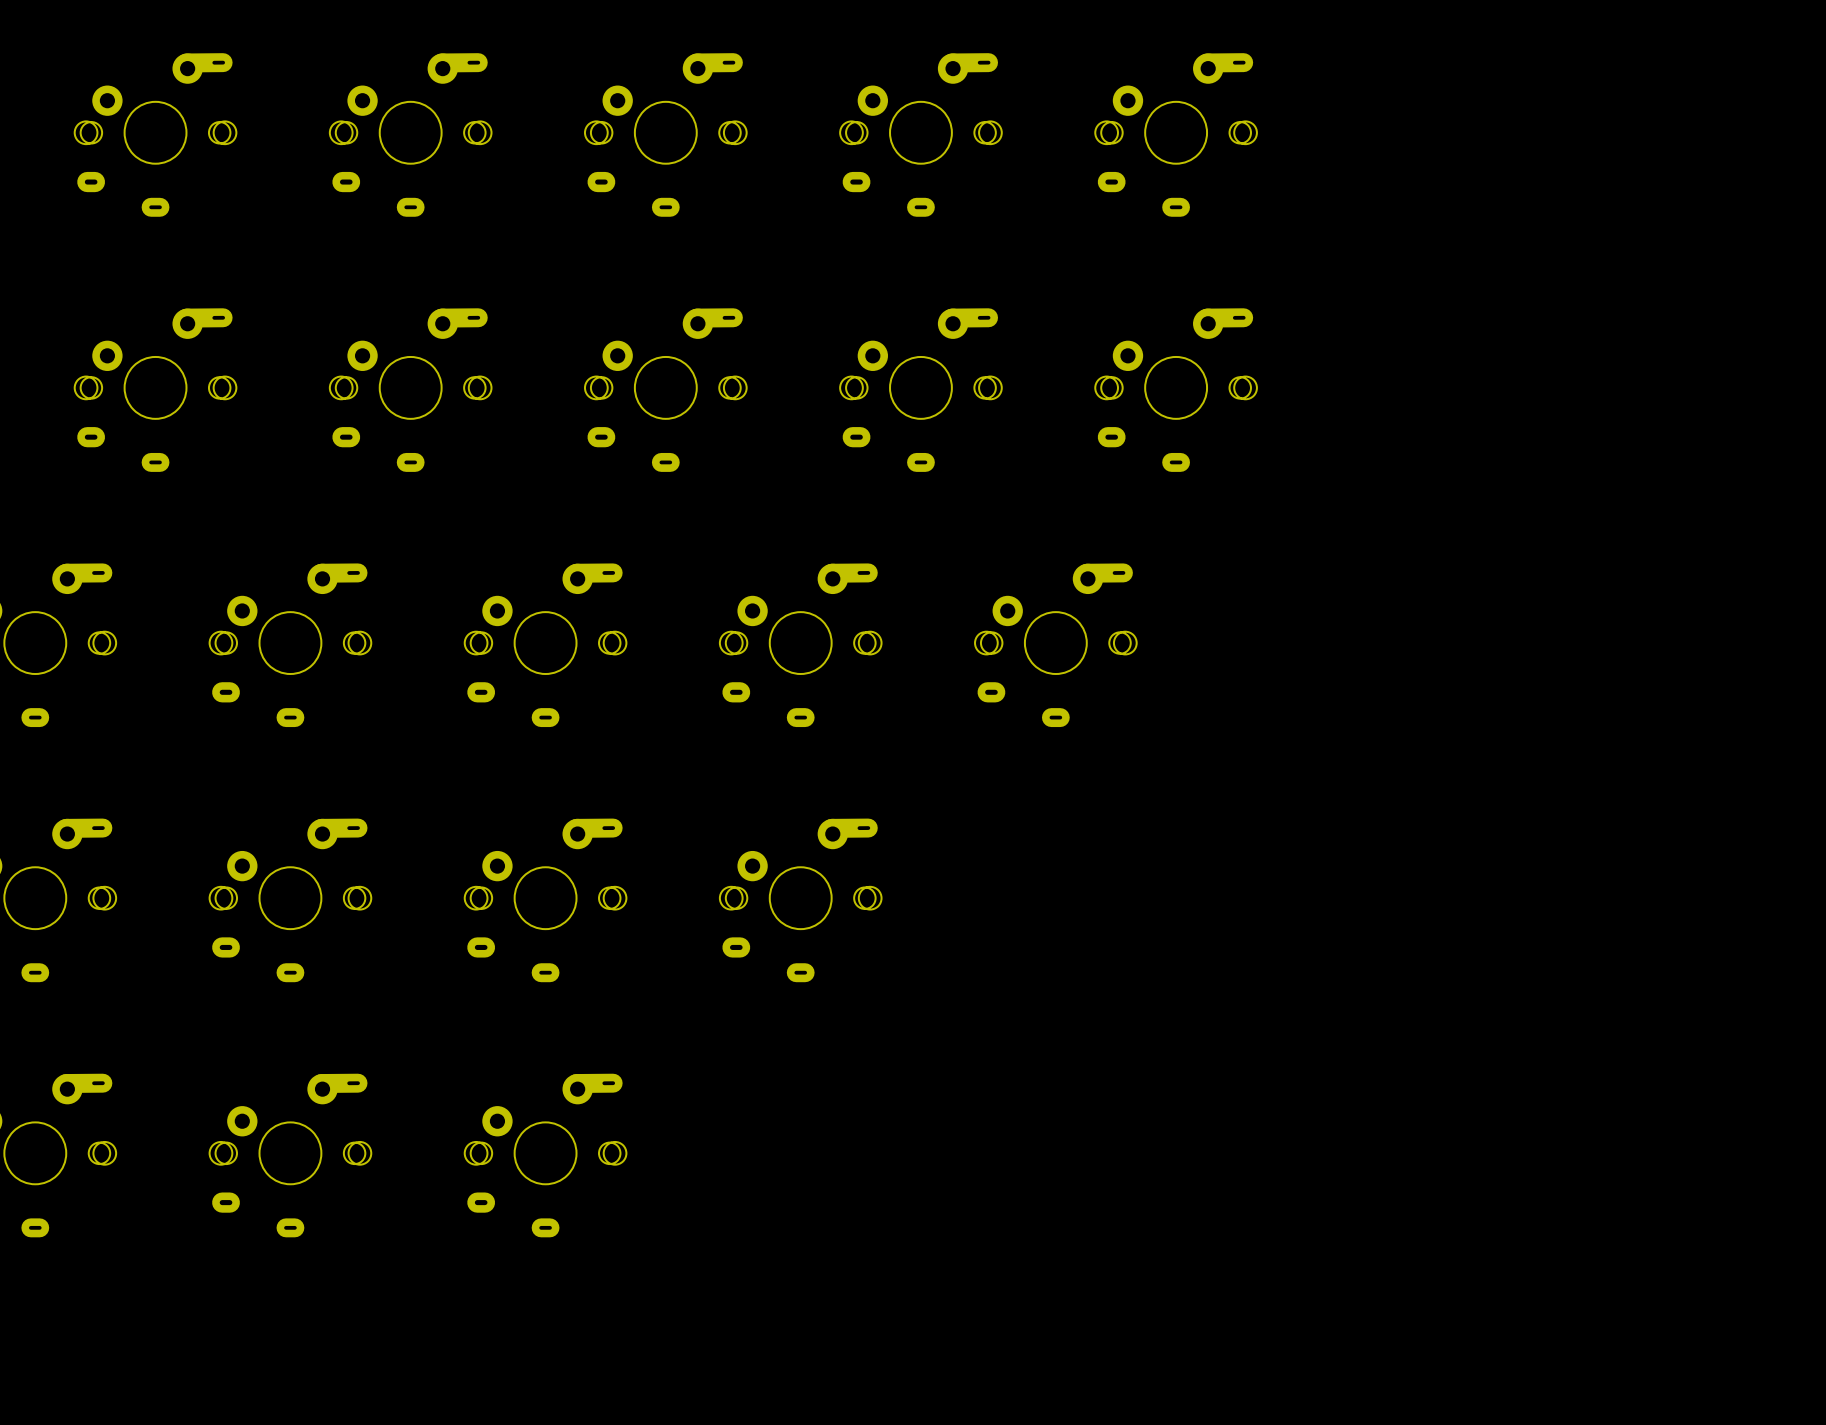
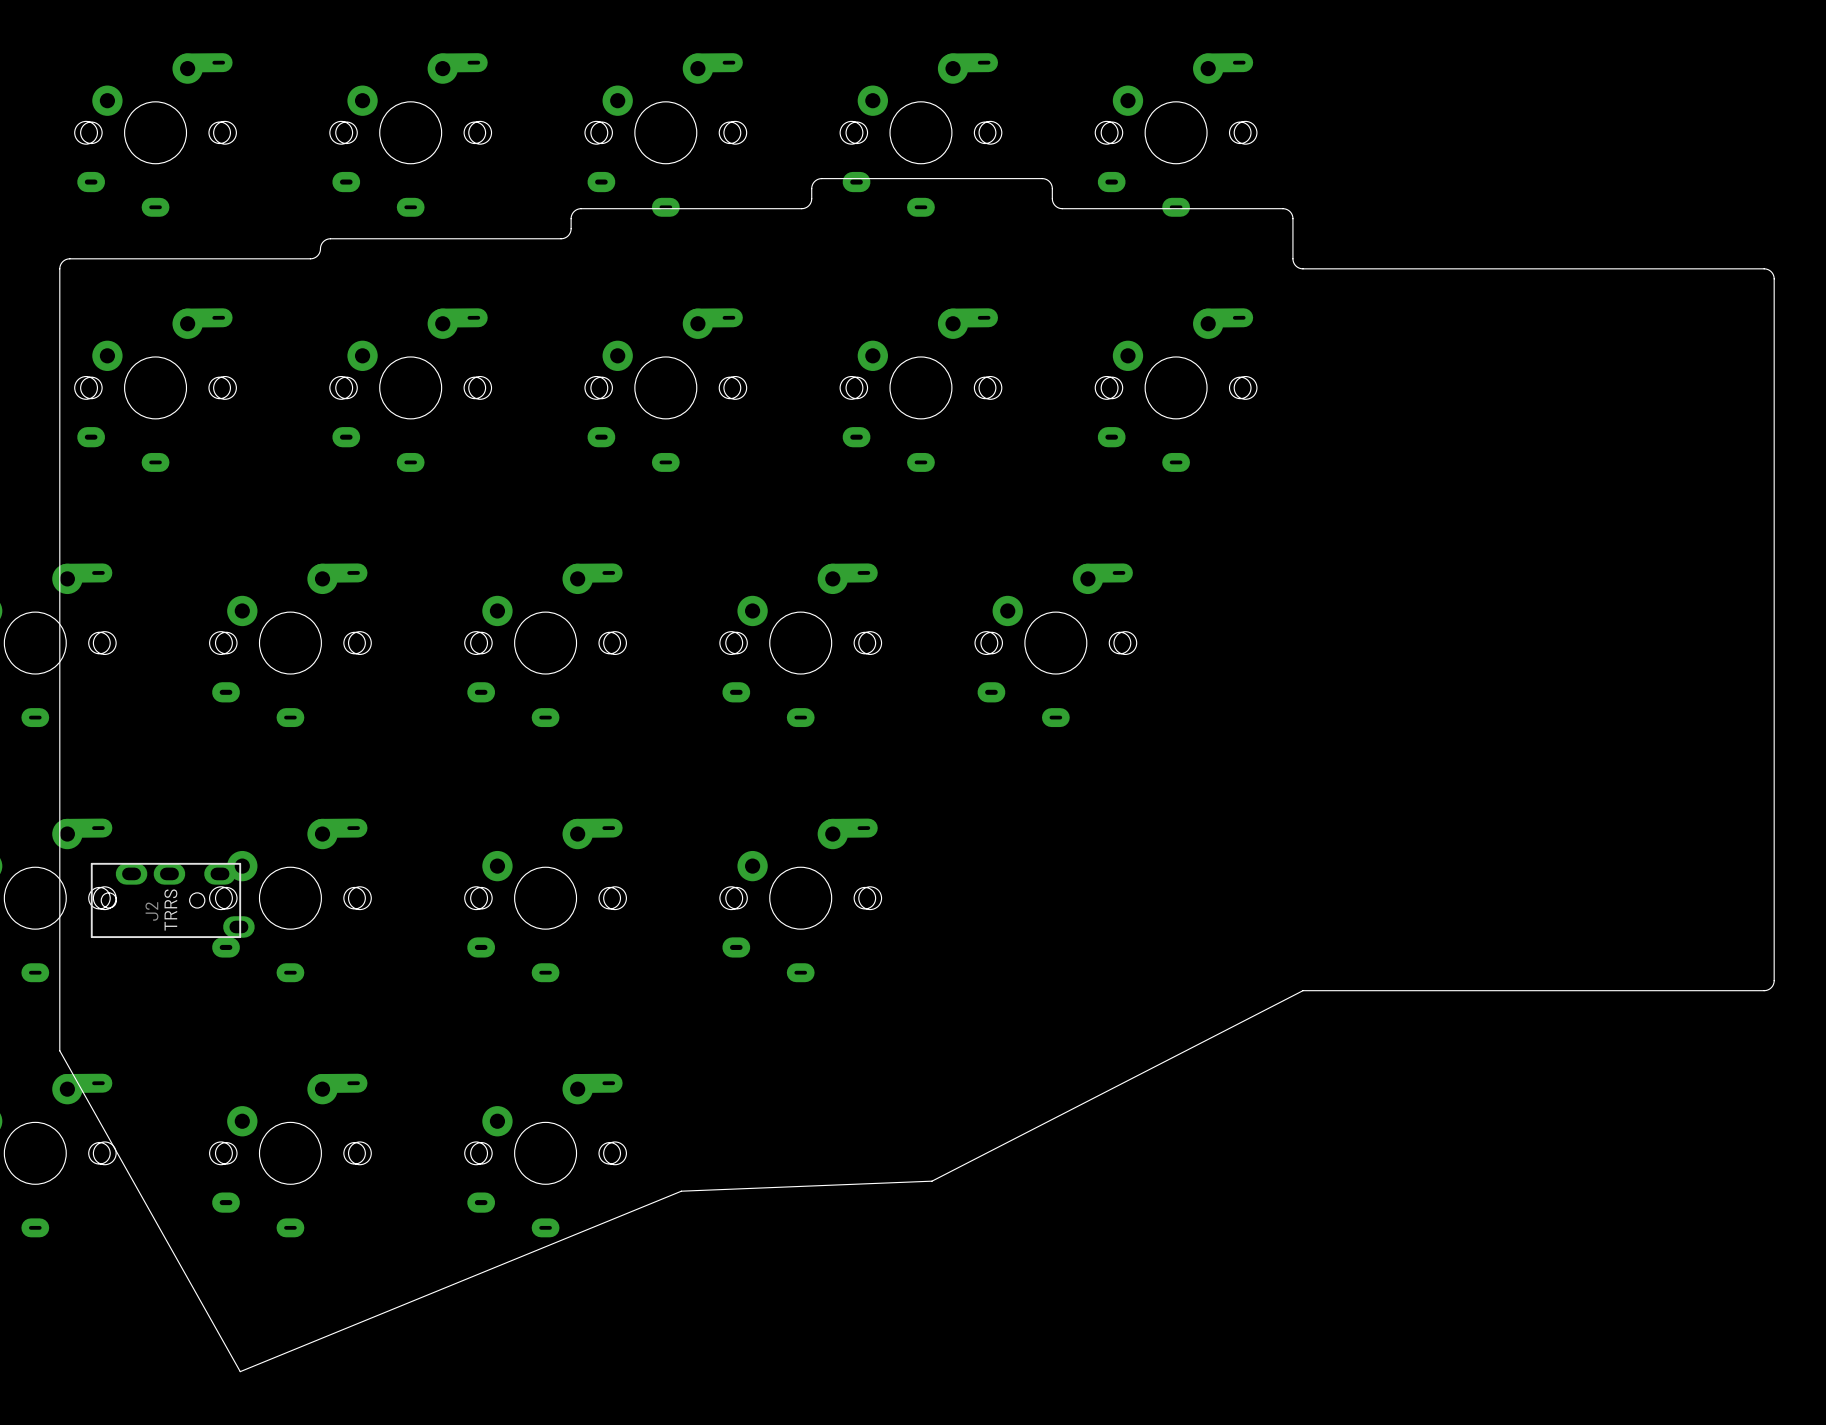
board edge: none -> (59, 268) (59, 1050) (240, 1371) (681, 1191) (932, 1181) (1302, 990) (1764, 990) (1770, 988) (1773, 984) (1774, 278) (1772, 273) (1767, 269) (1301, 268) (1295, 265) (1293, 261) (1292, 217) (1286, 209) (1061, 208) (1053, 202) (1050, 183) (1042, 178) (820, 178) (813, 183) (810, 202) (803, 208) (578, 209) (571, 214) (569, 233) (562, 238) (330, 238) (323, 241) (318, 254) (311, 258) (69, 258) (62, 261) (59, 268)
J2: none -> (172, 900)

